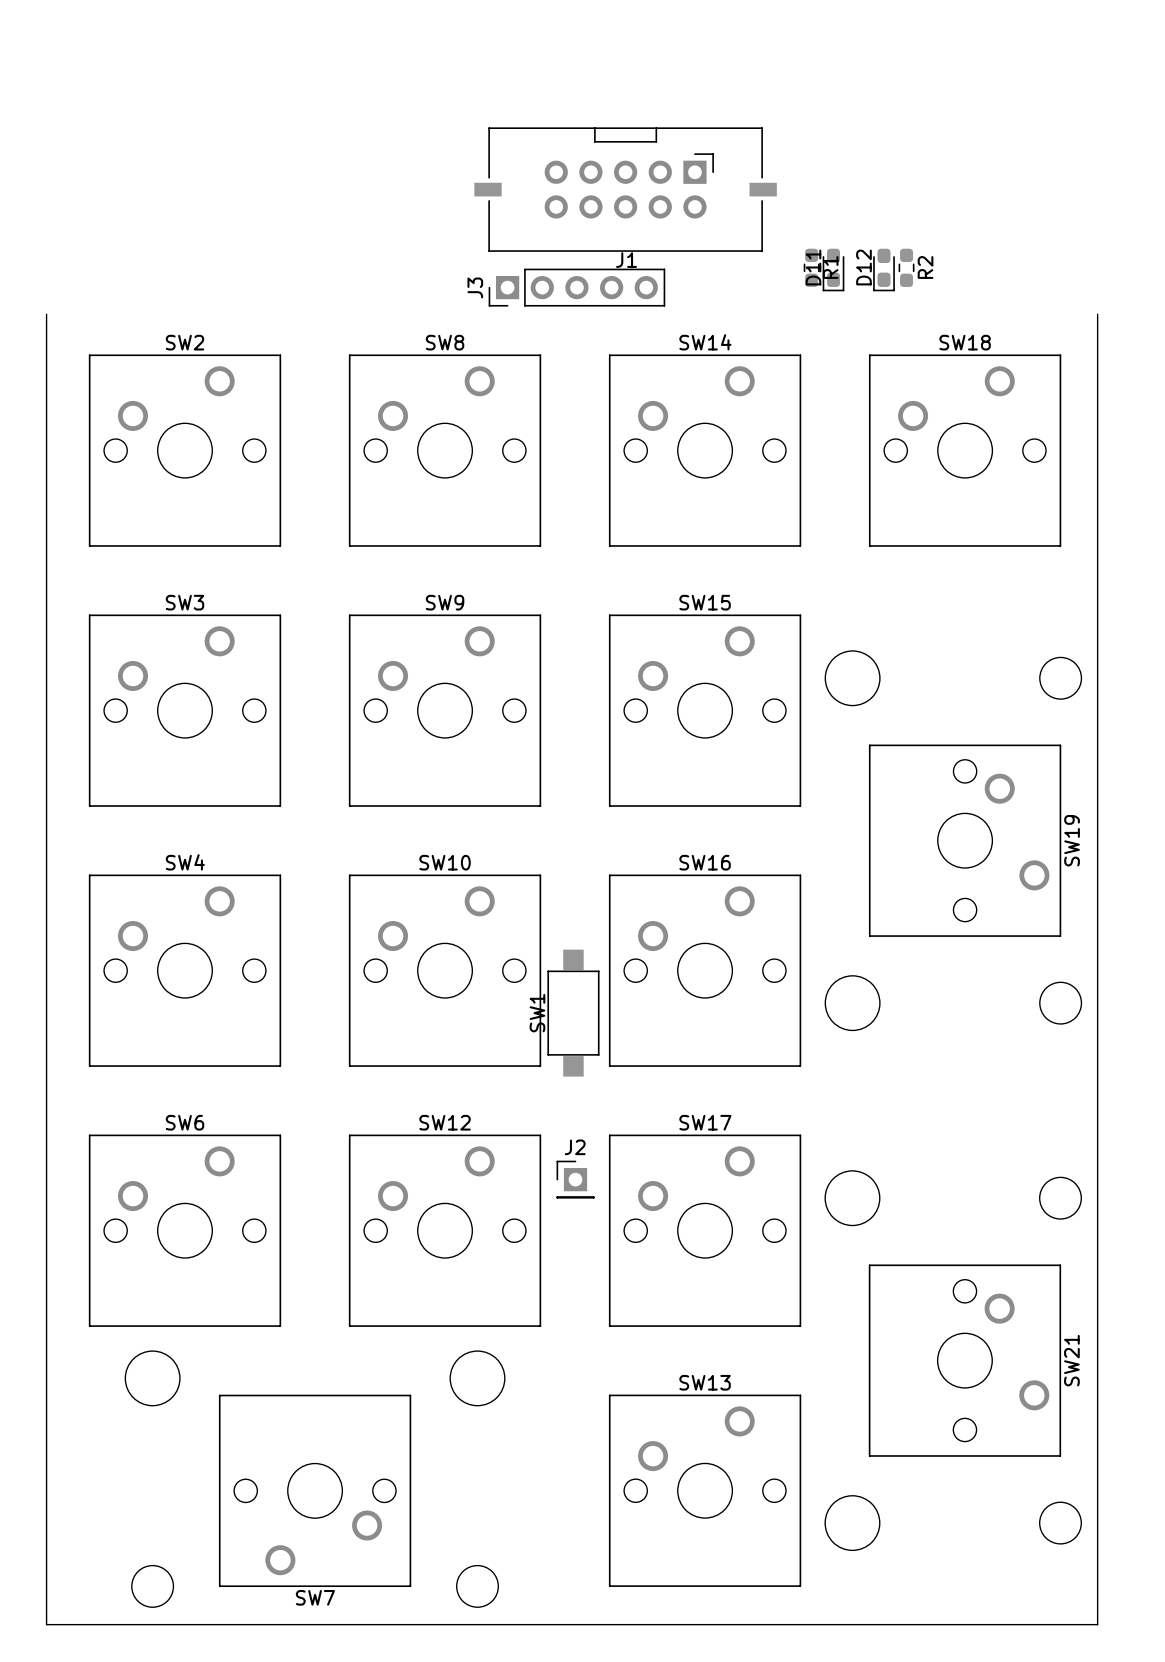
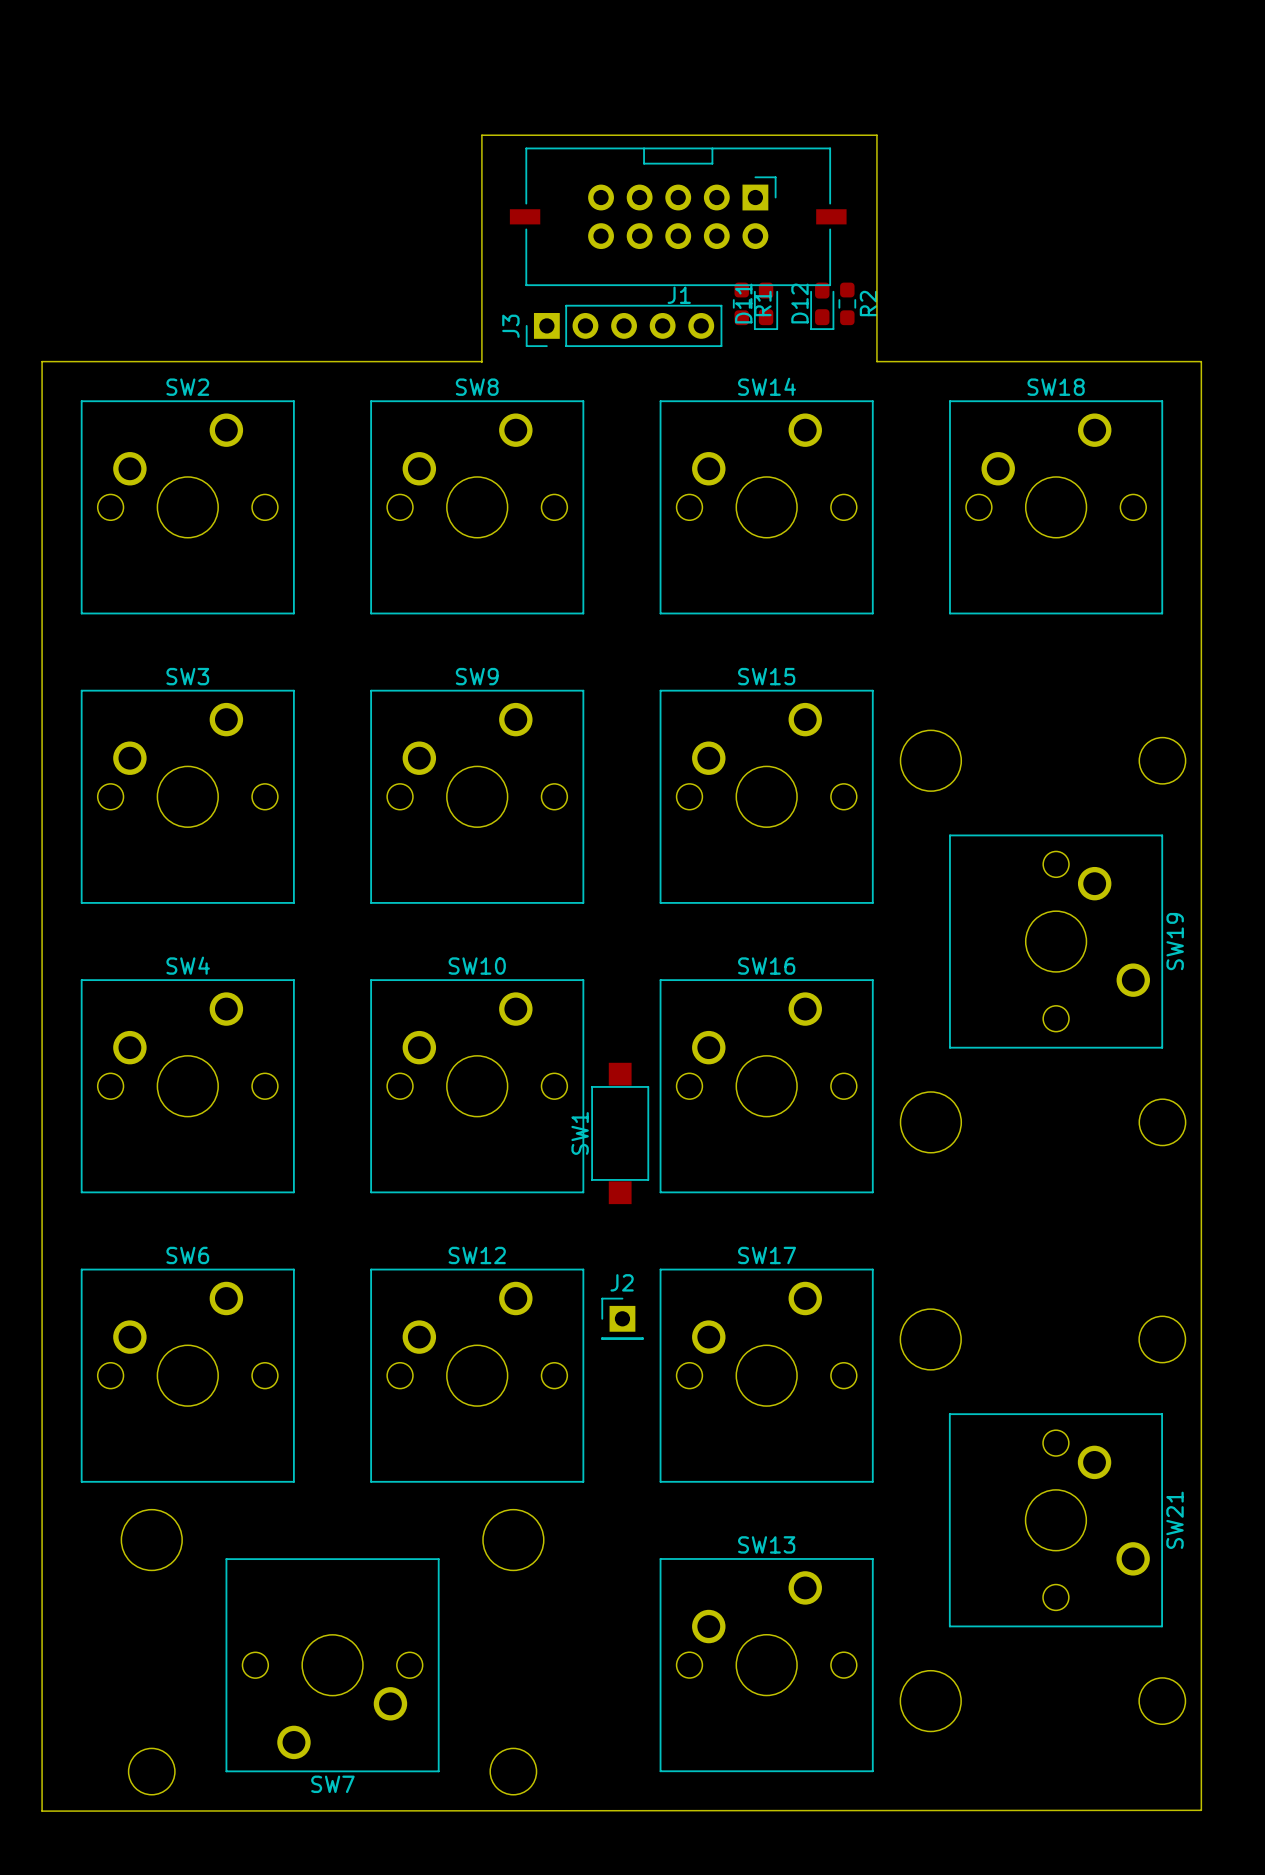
R1 position: (811, 267) -> (741, 303)
R2 position: (906, 267) -> (847, 303)
D11 position: (833, 270) -> (766, 306)
D12 position: (884, 270) -> (822, 306)
board edge: (46, 314) (46, 1624) (1097, 1624) (1097, 314) -> none
board edge: none -> (481, 361) (42, 361) (42, 1811) (1201, 1810) (1201, 361) (876, 361) (876, 135) (481, 135) (481, 362)

